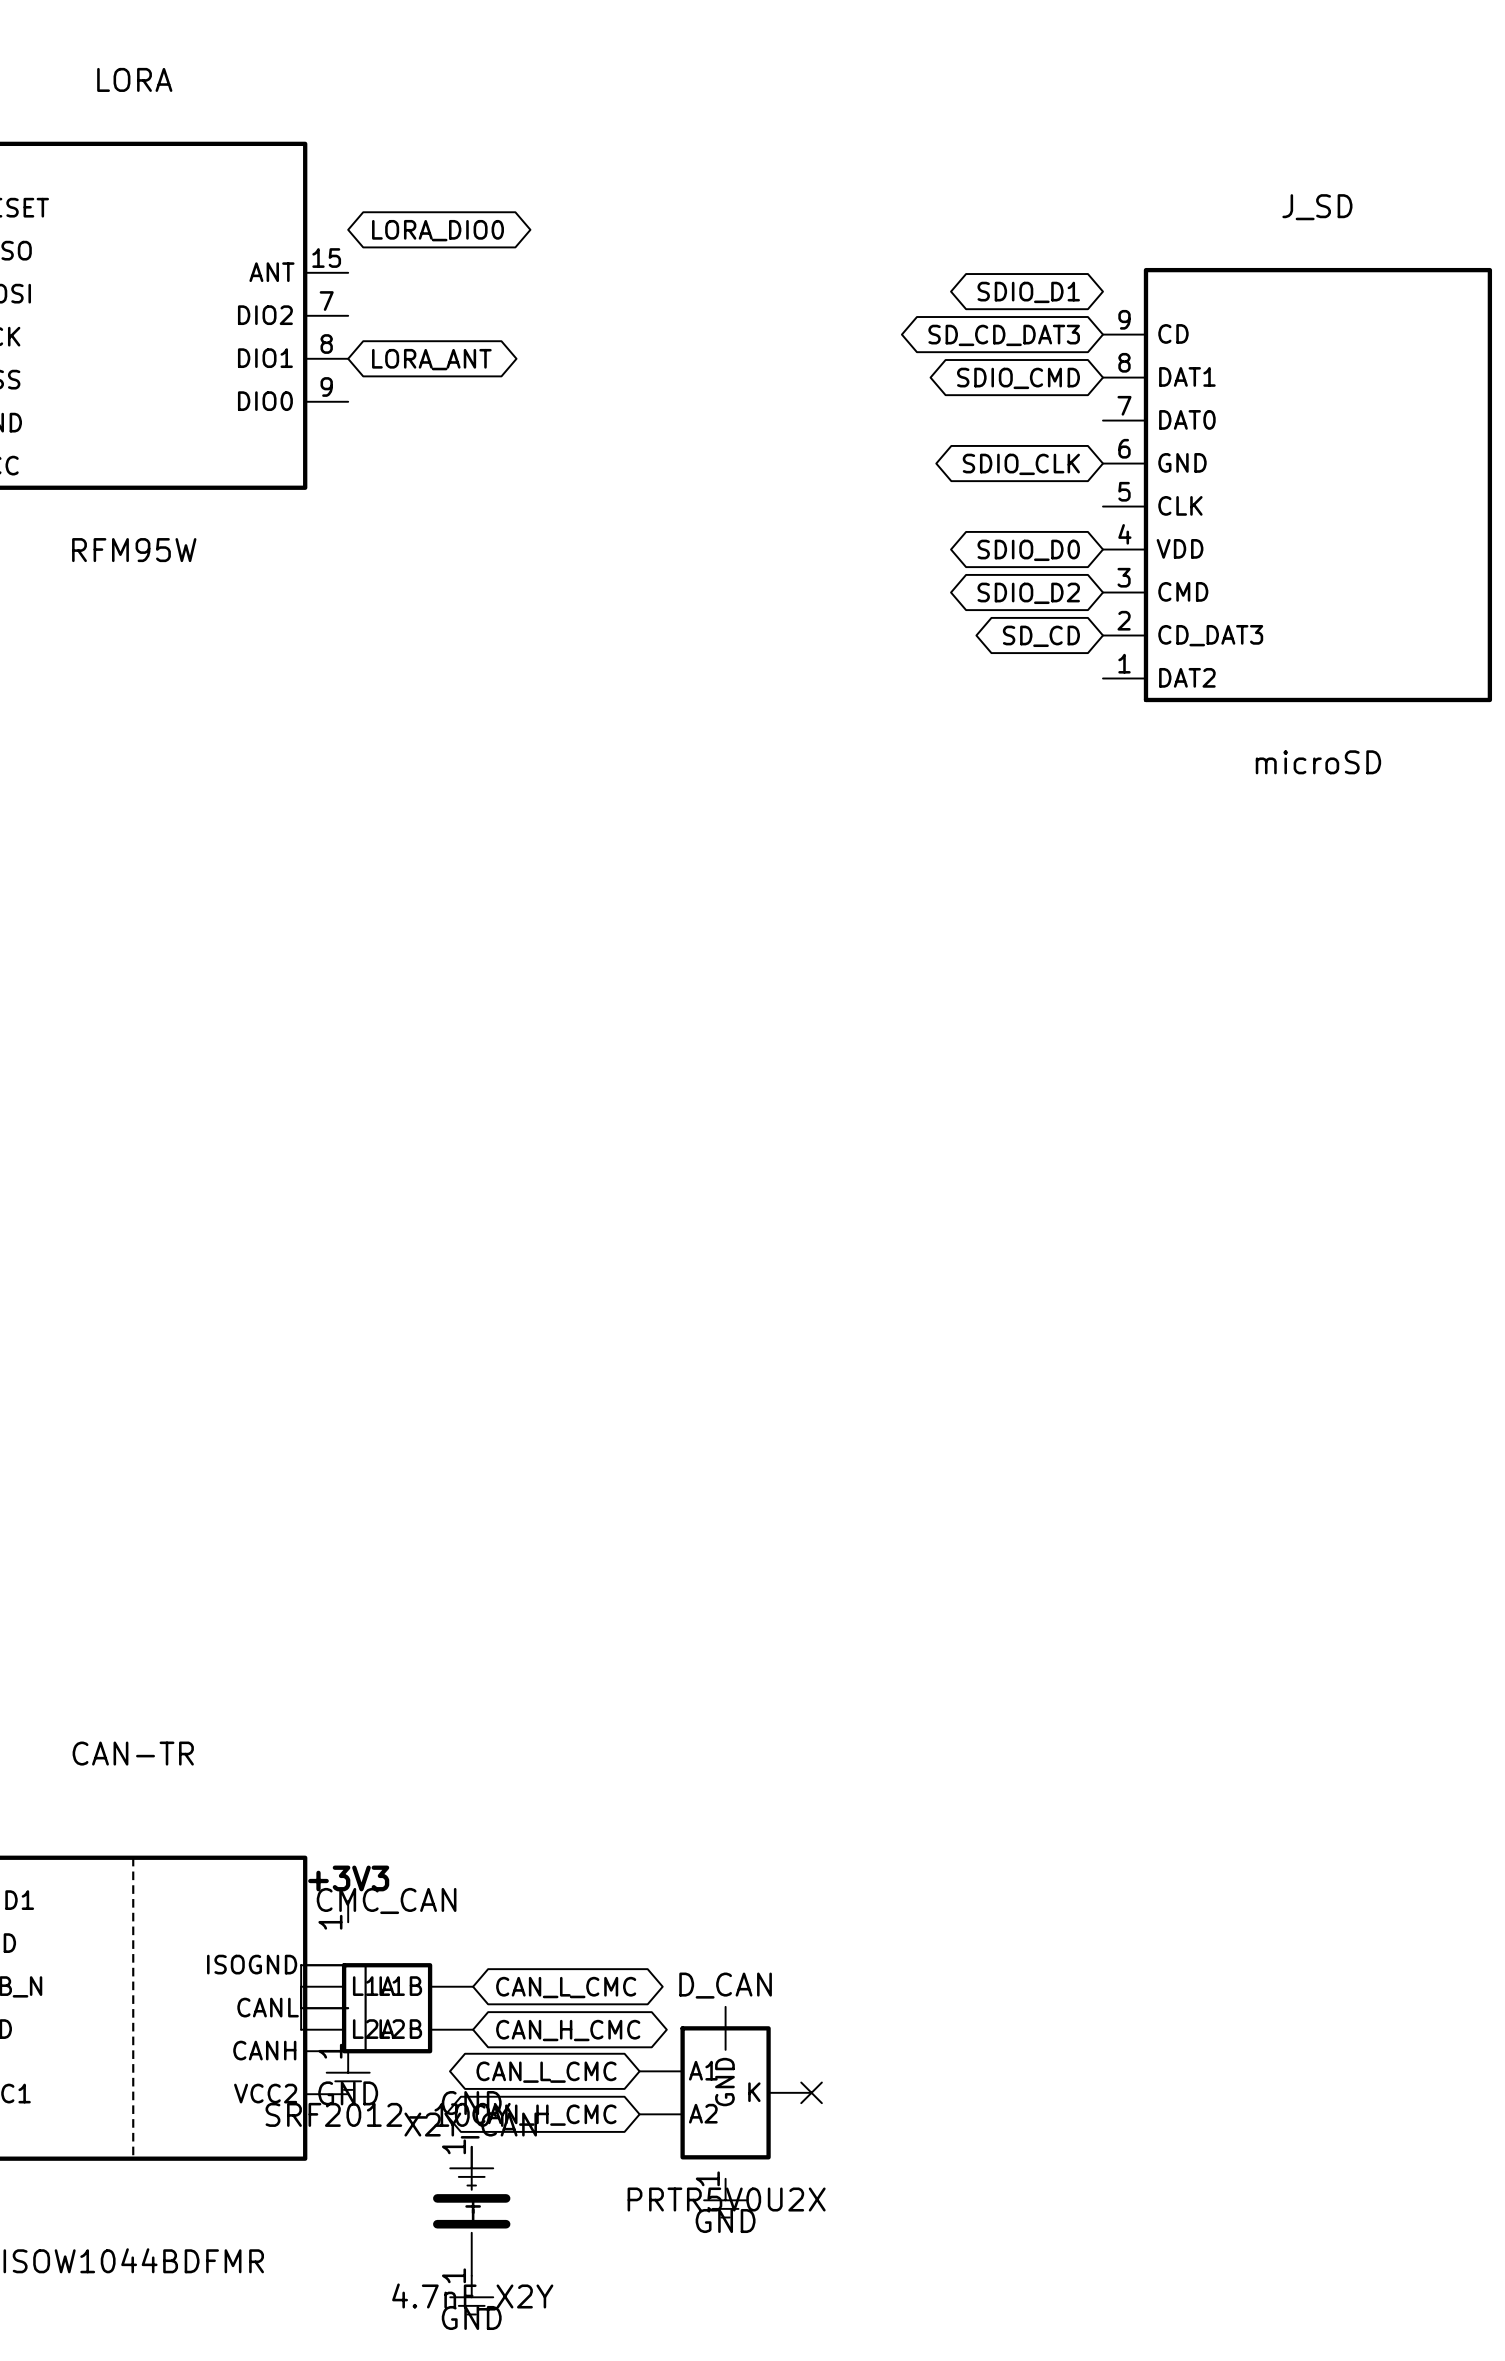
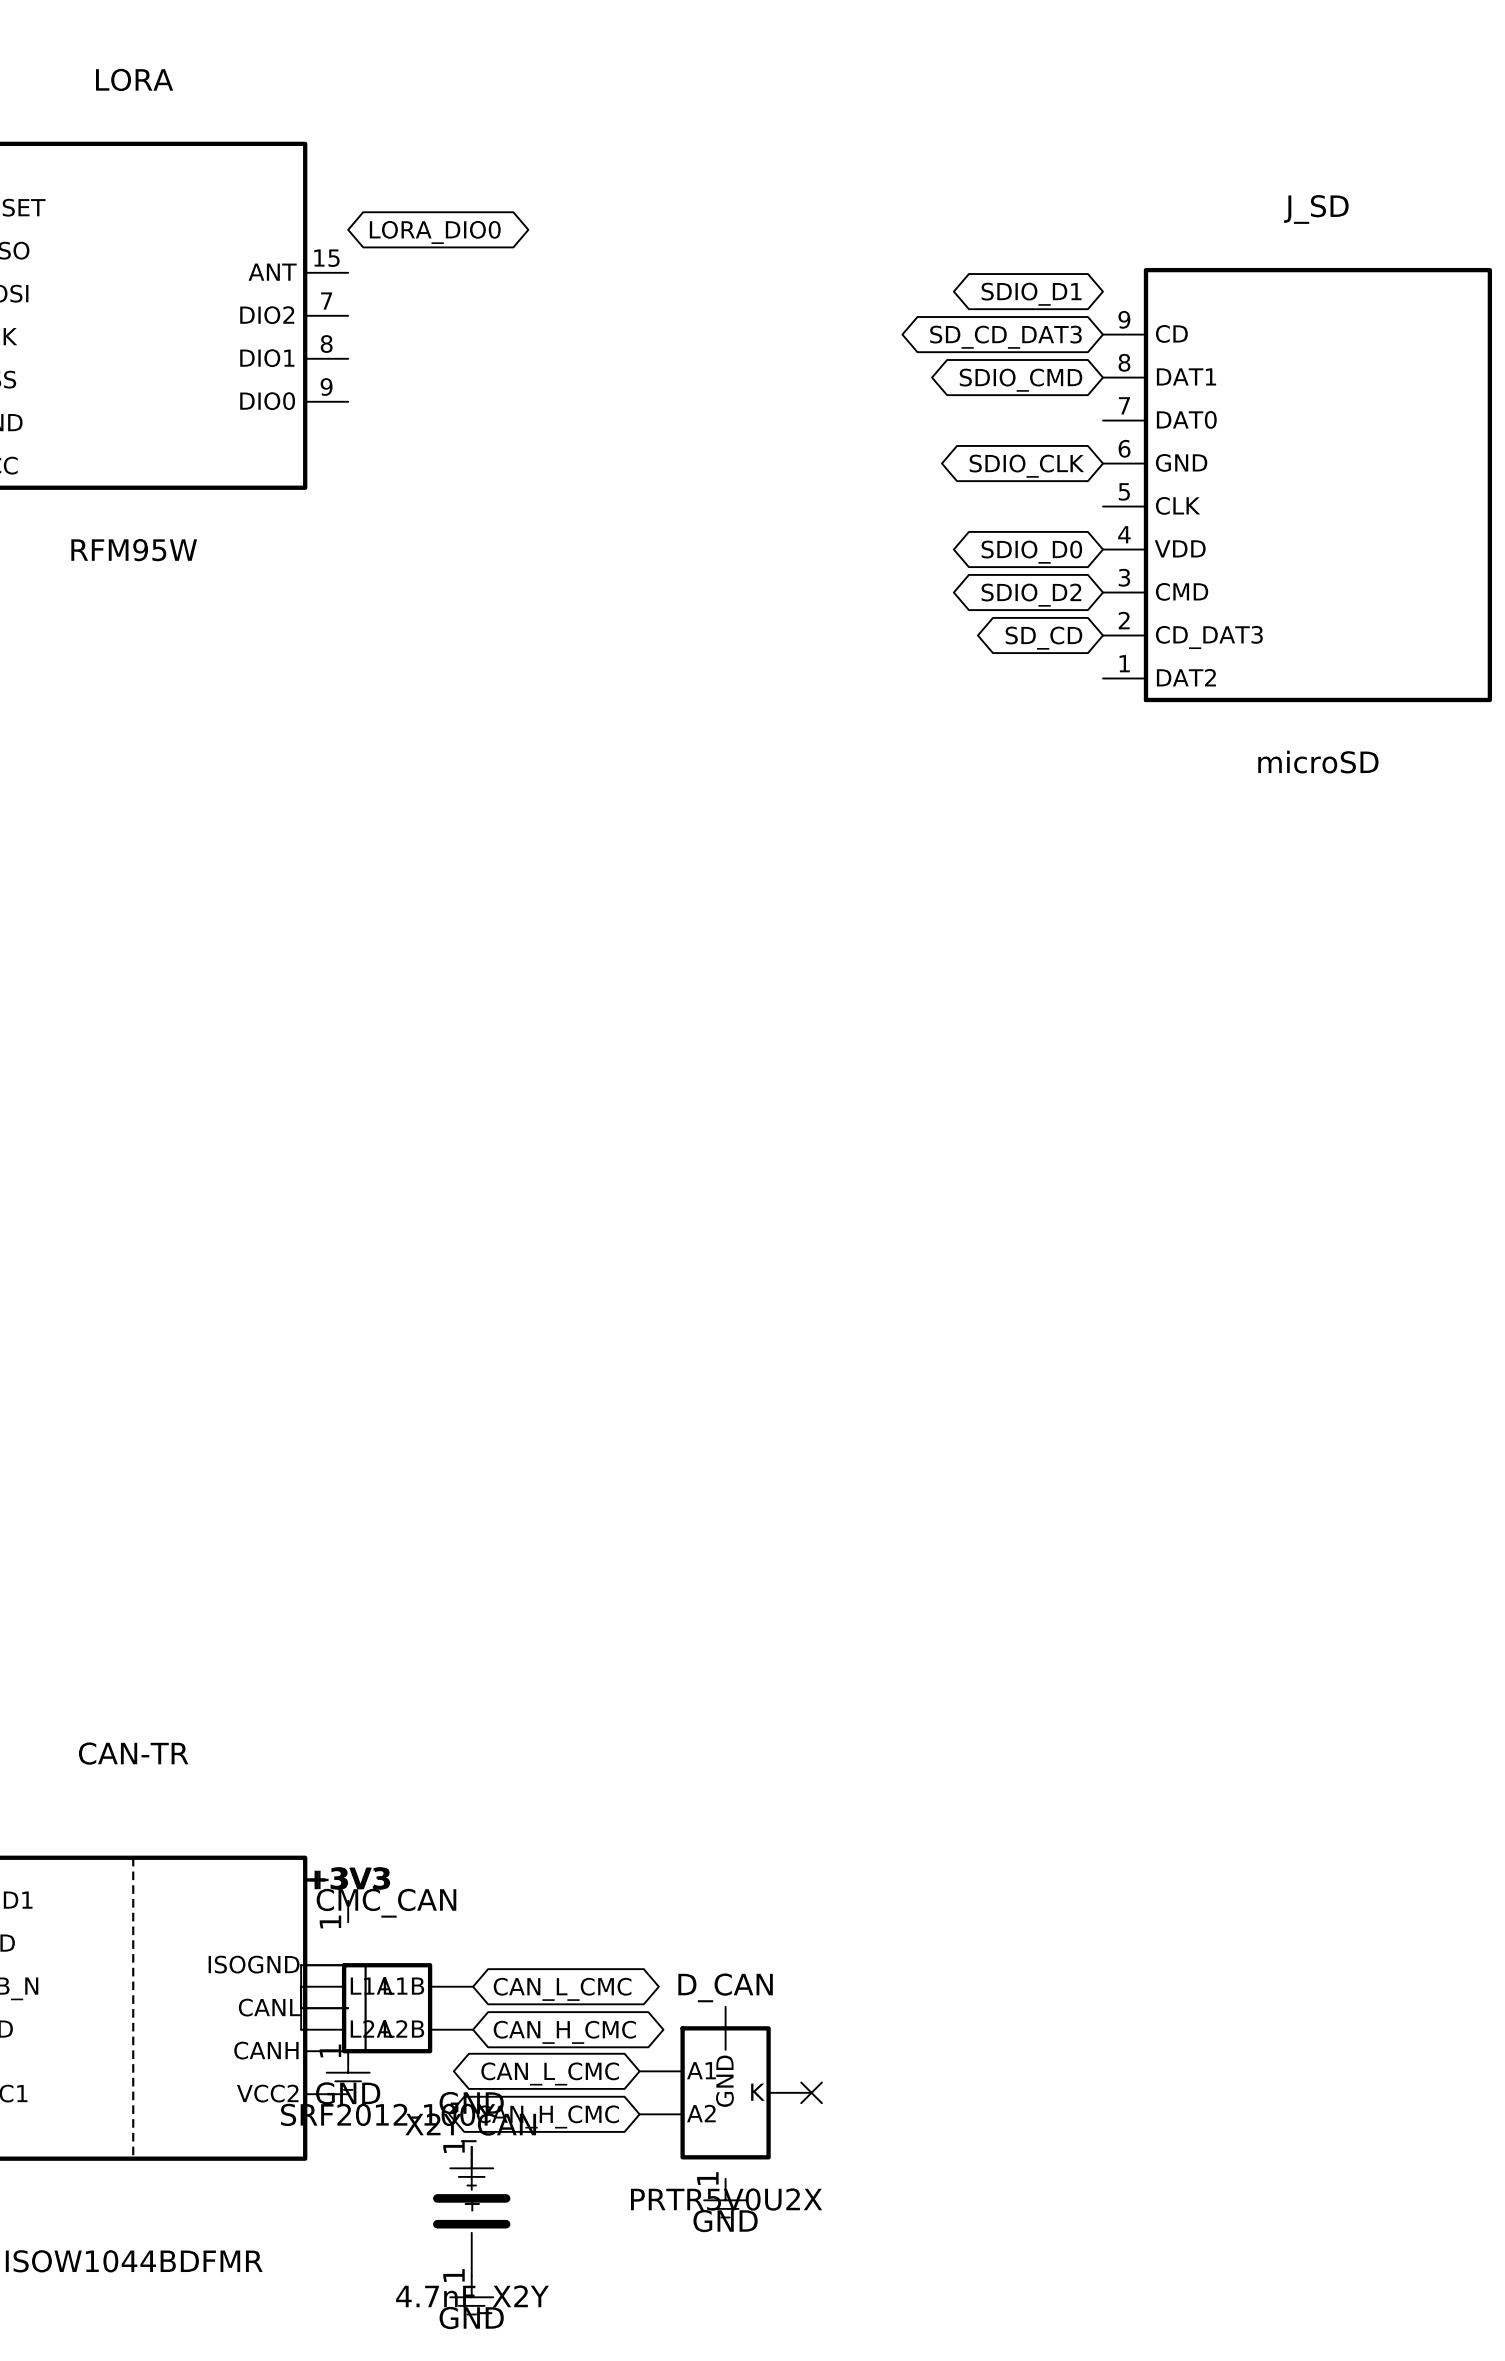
global label: LORA_ANT (431, 359) -> none

